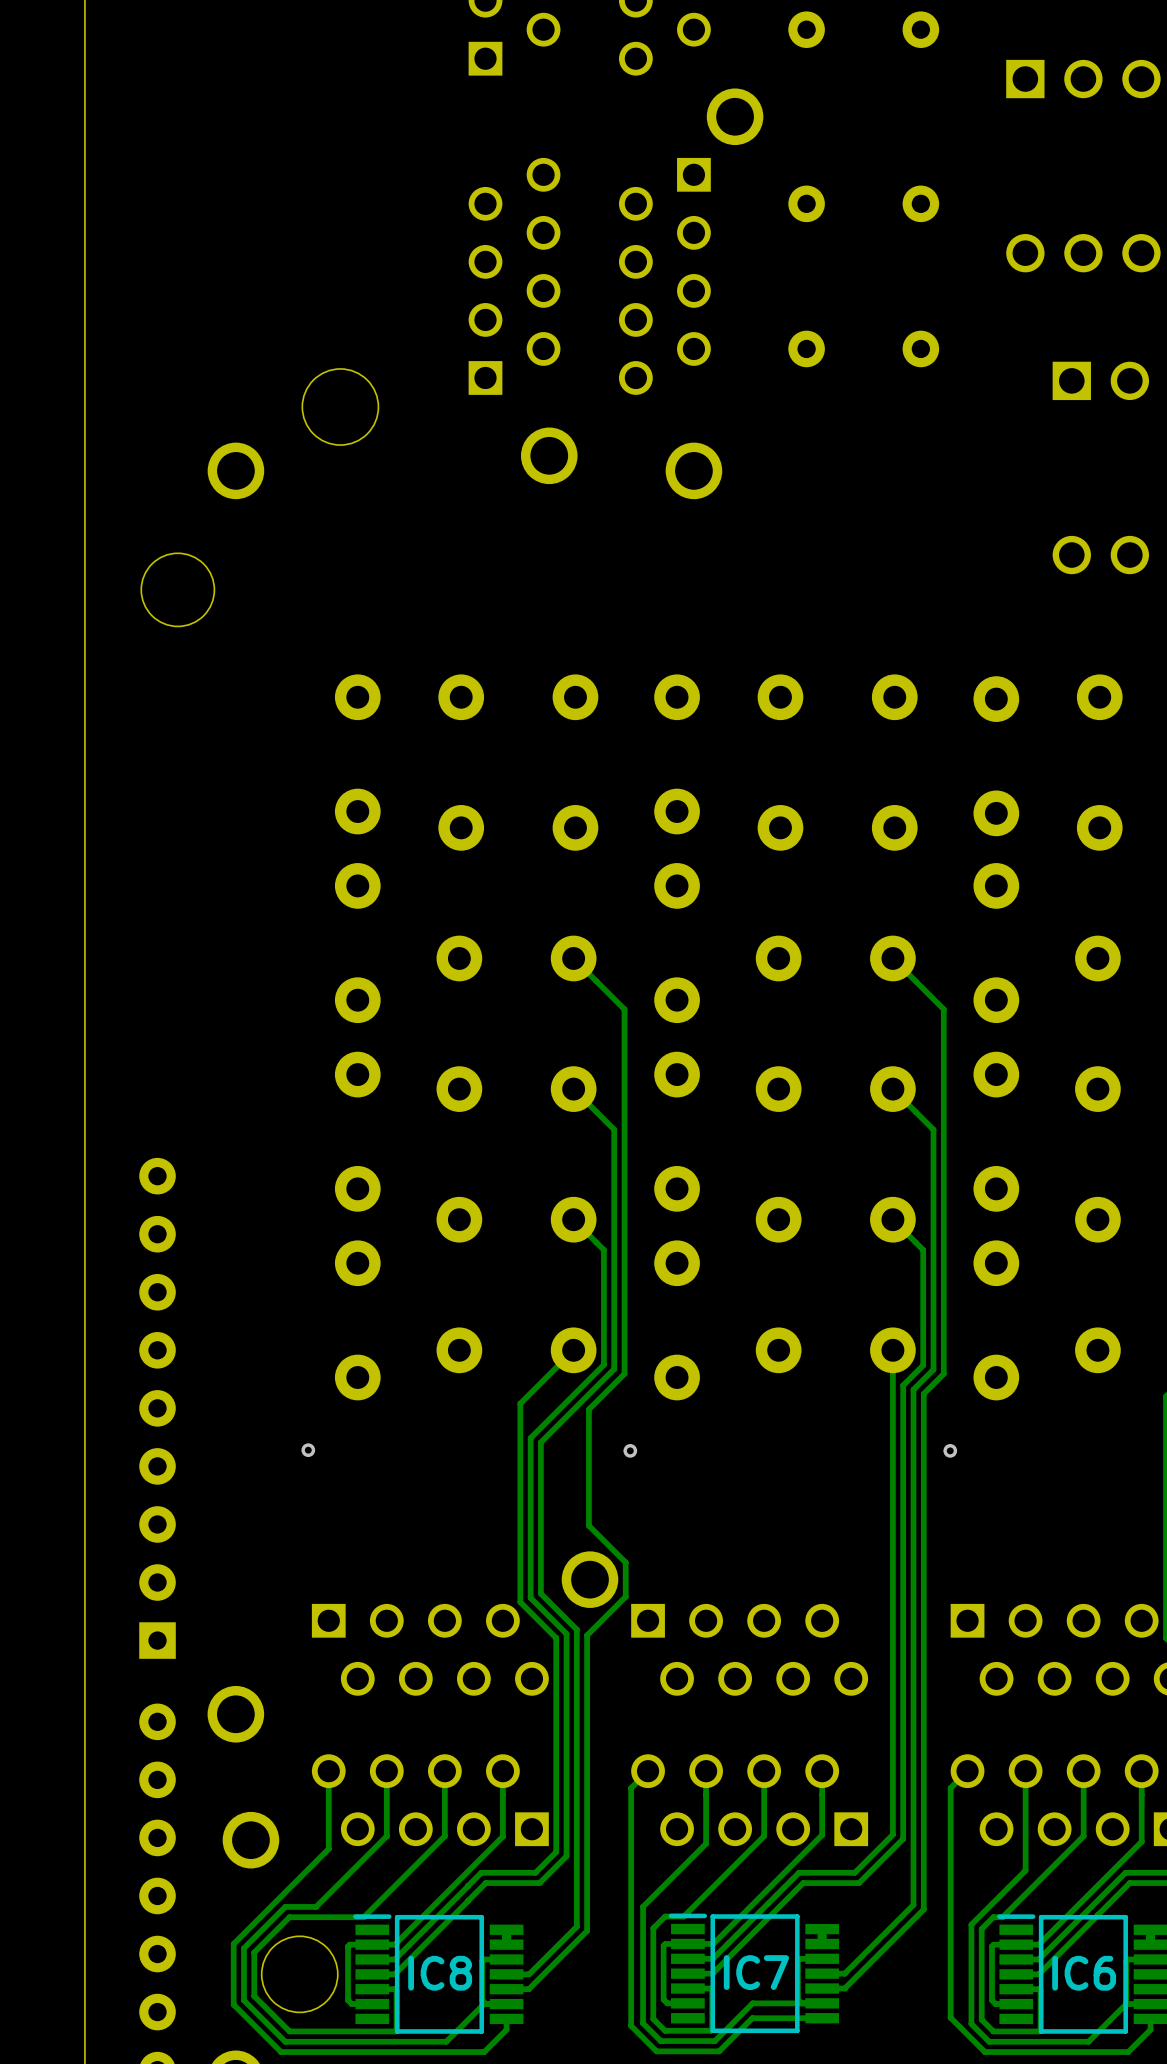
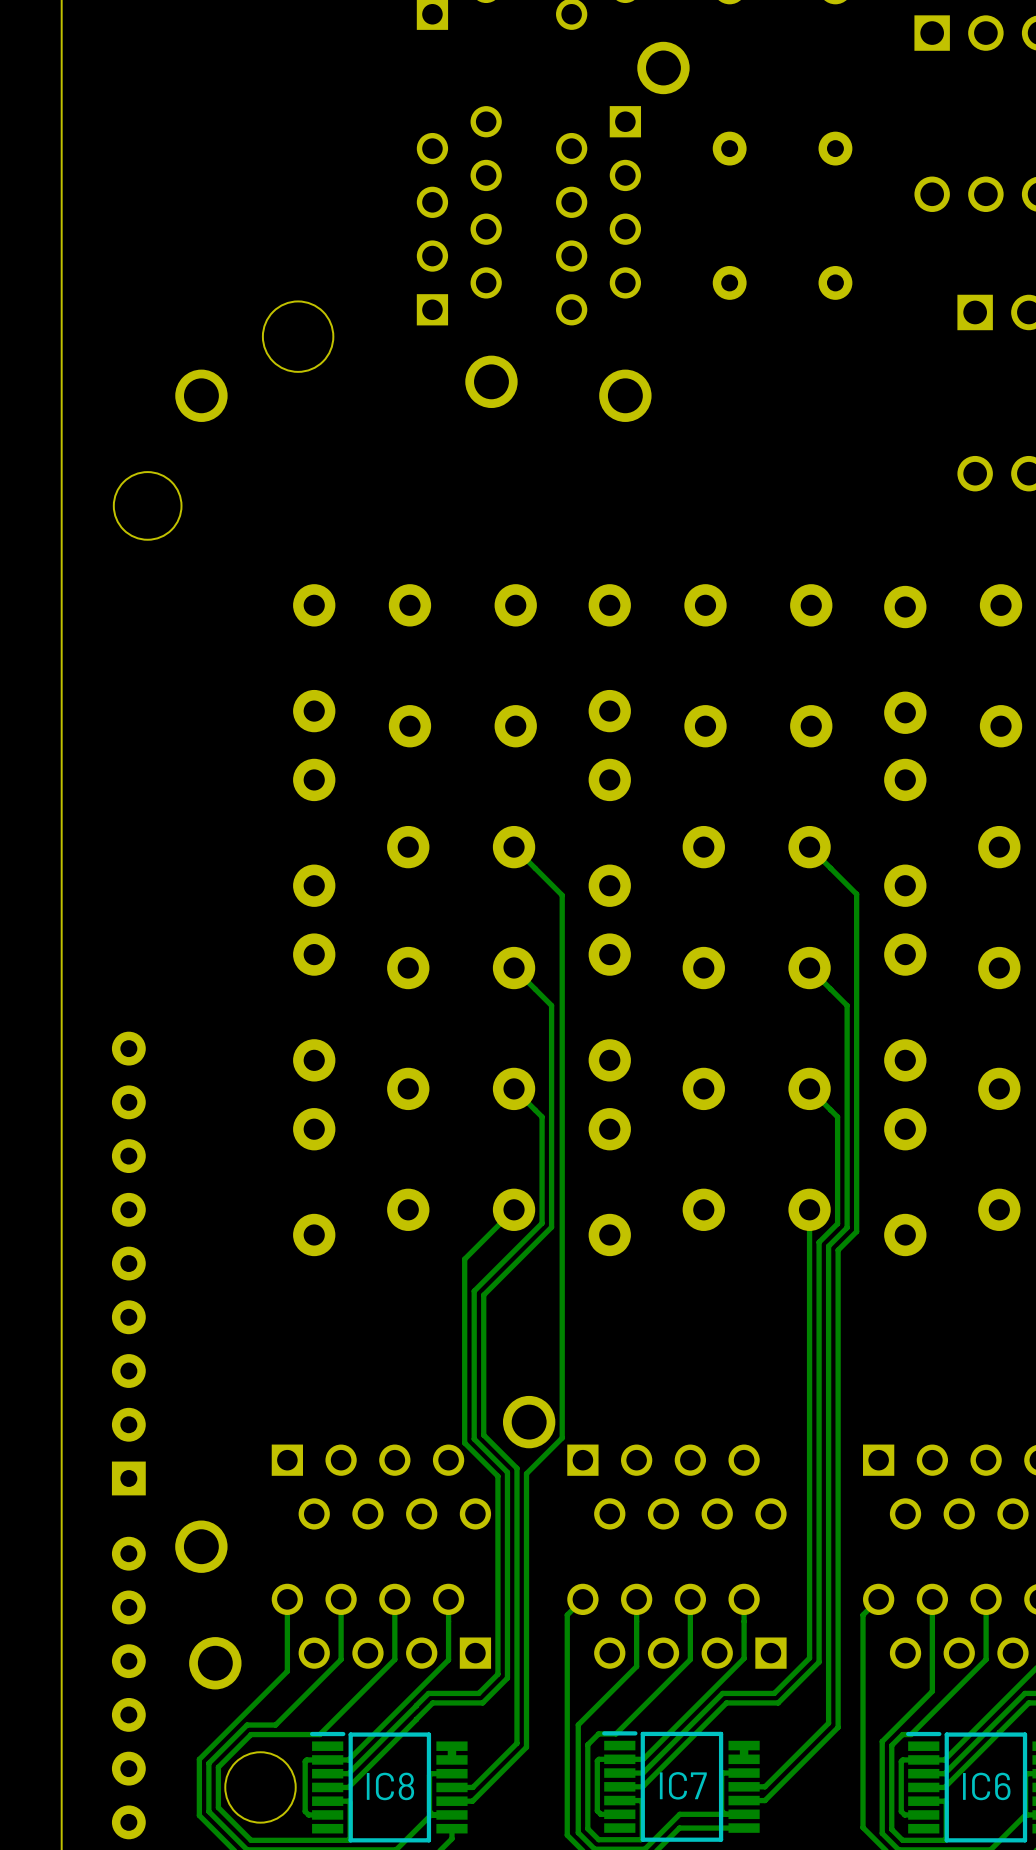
track: (624, 1009) (624, 1373) (588, 1409) (588, 1525) (625, 1562) -> (561, 894) (562, 1406)
via: (308, 1450) -> none
via: (630, 1450) -> none
via: (950, 1450) -> none

